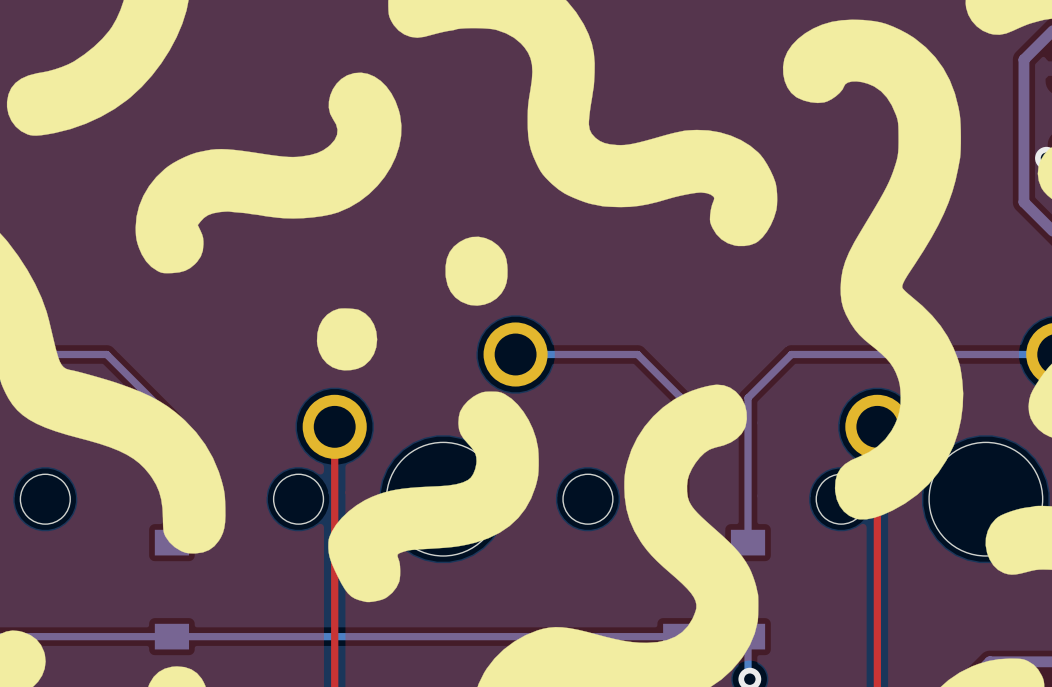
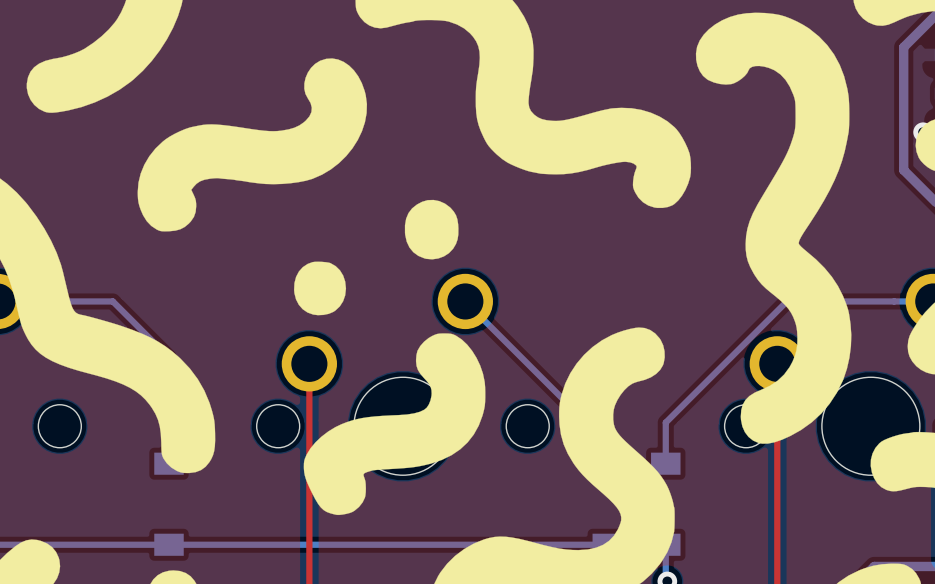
bottom track: (515, 354) (637, 354) (680, 397) (680, 519) -> (465, 301) (607, 443)
bottom track: (888, 354) (791, 354) (748, 397) (748, 494) -> (786, 301) (665, 422)

